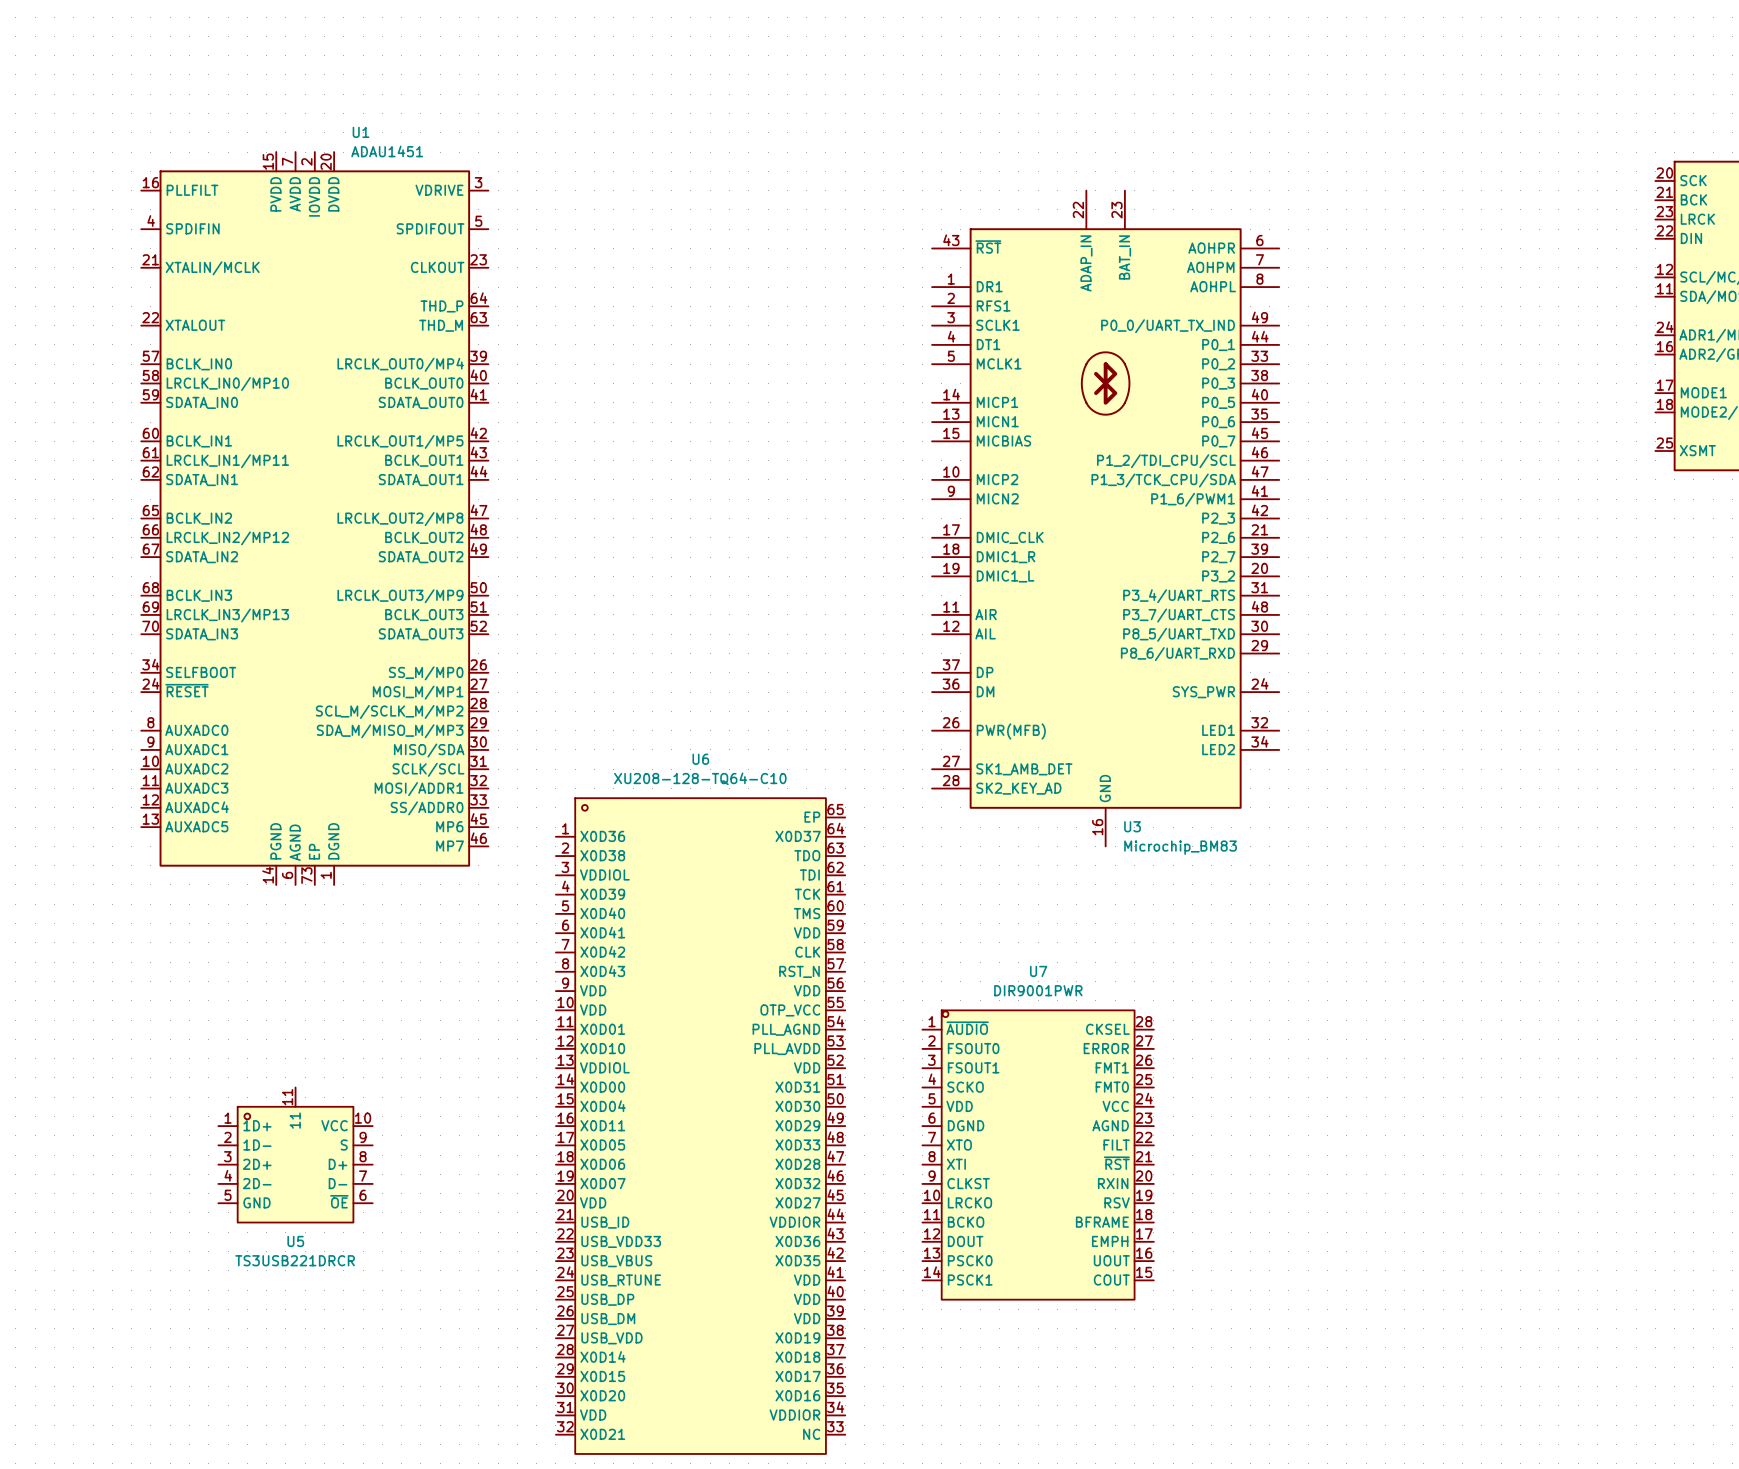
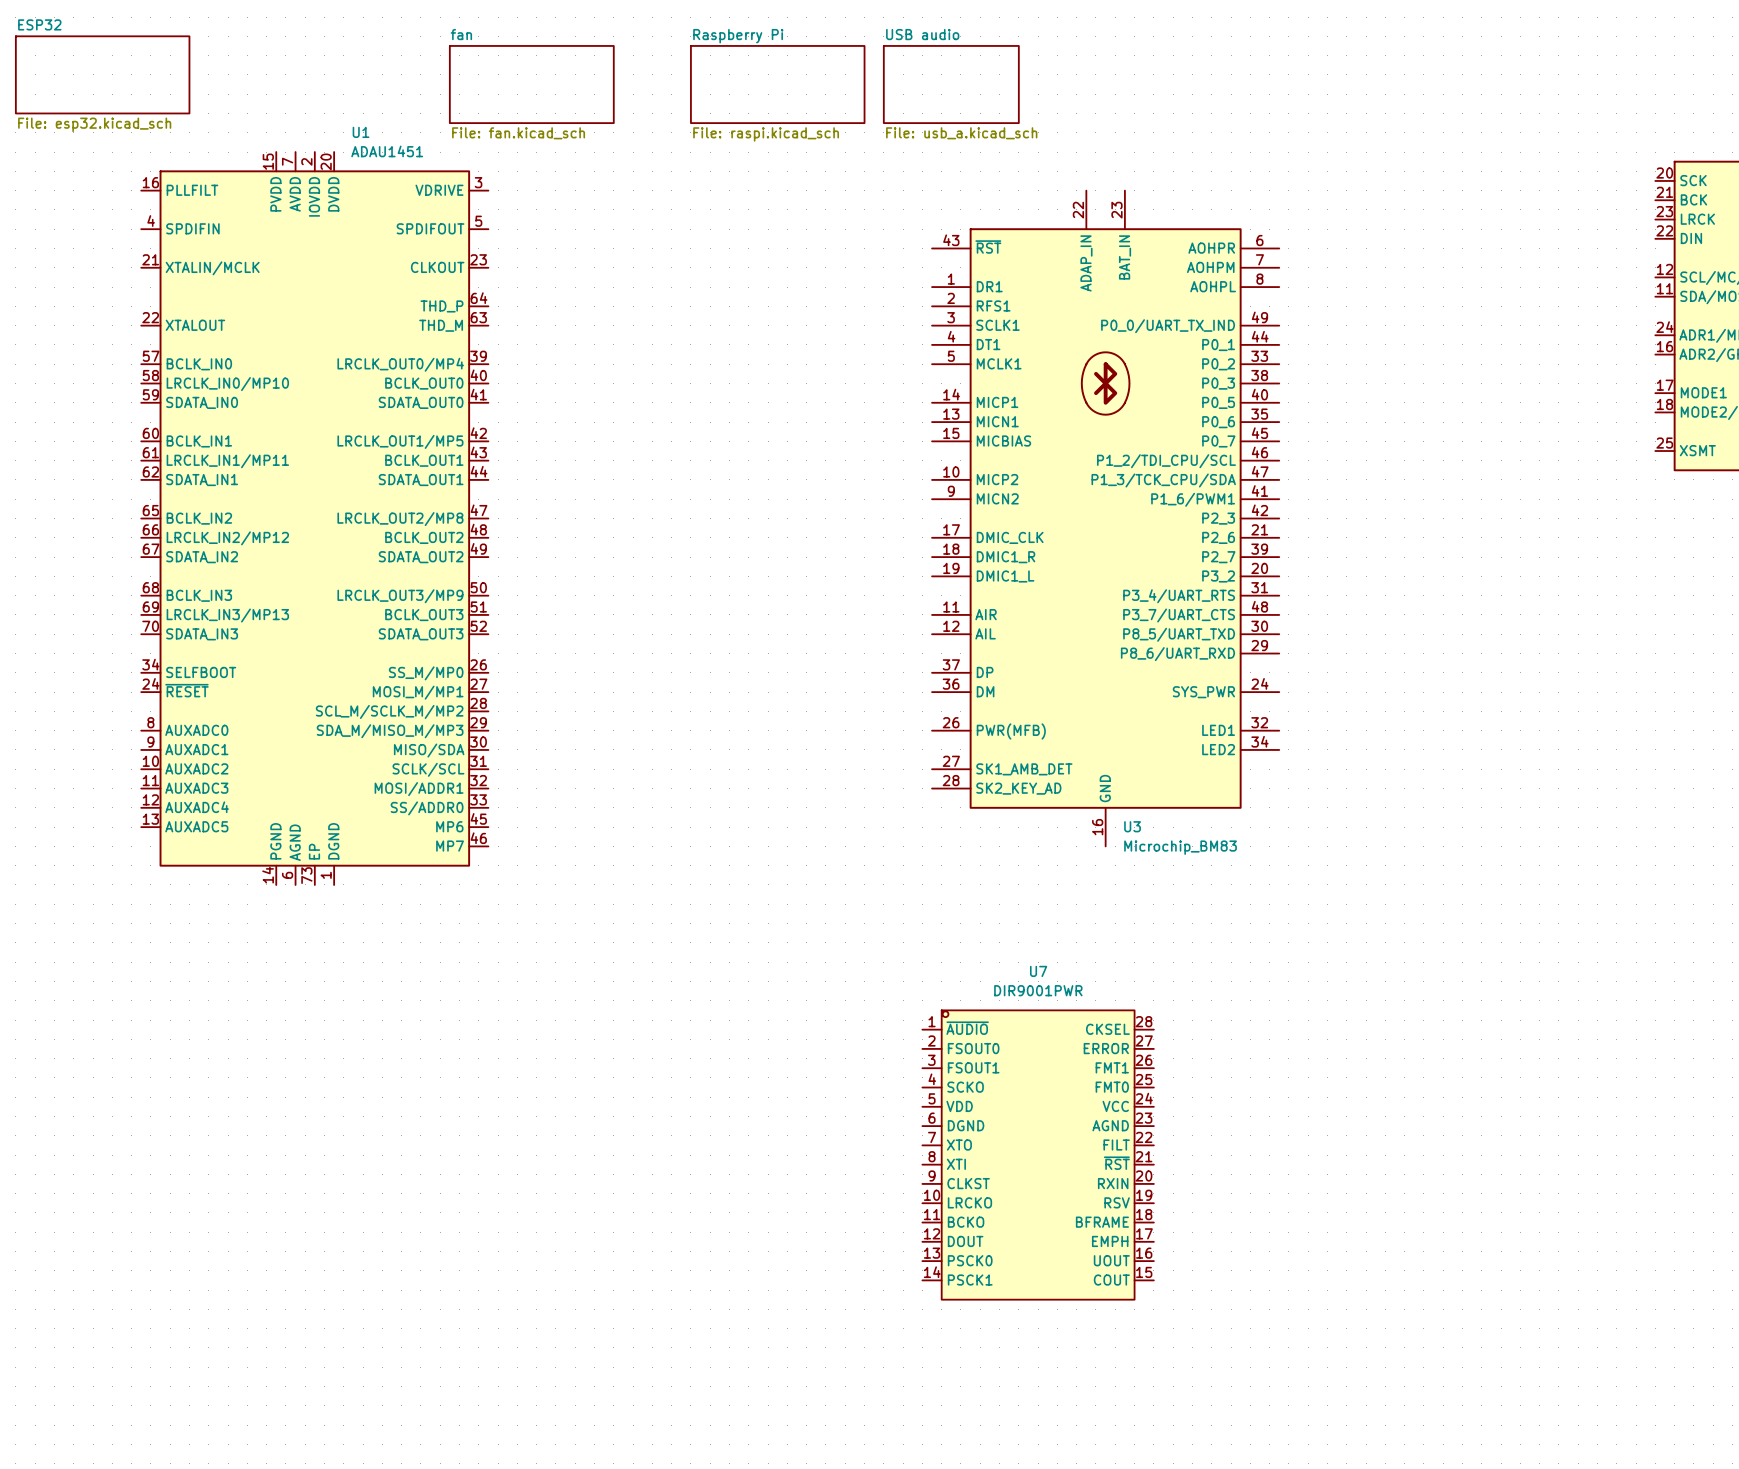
sheet ESP32: none -> File: esp32.kicad_sch (102, 74)
sheet fan: none -> File: fan.kicad_sch (531, 84)
sheet Raspberry Pi: none -> File: raspi.kicad_sch (777, 84)
sheet USB audio: none -> File: usb_a.kicad_sch (951, 84)
U6: XU208-128-TQ64-C10 (700, 1126) -> none
U5: TS3USB221DRCR (295, 1155) -> none

